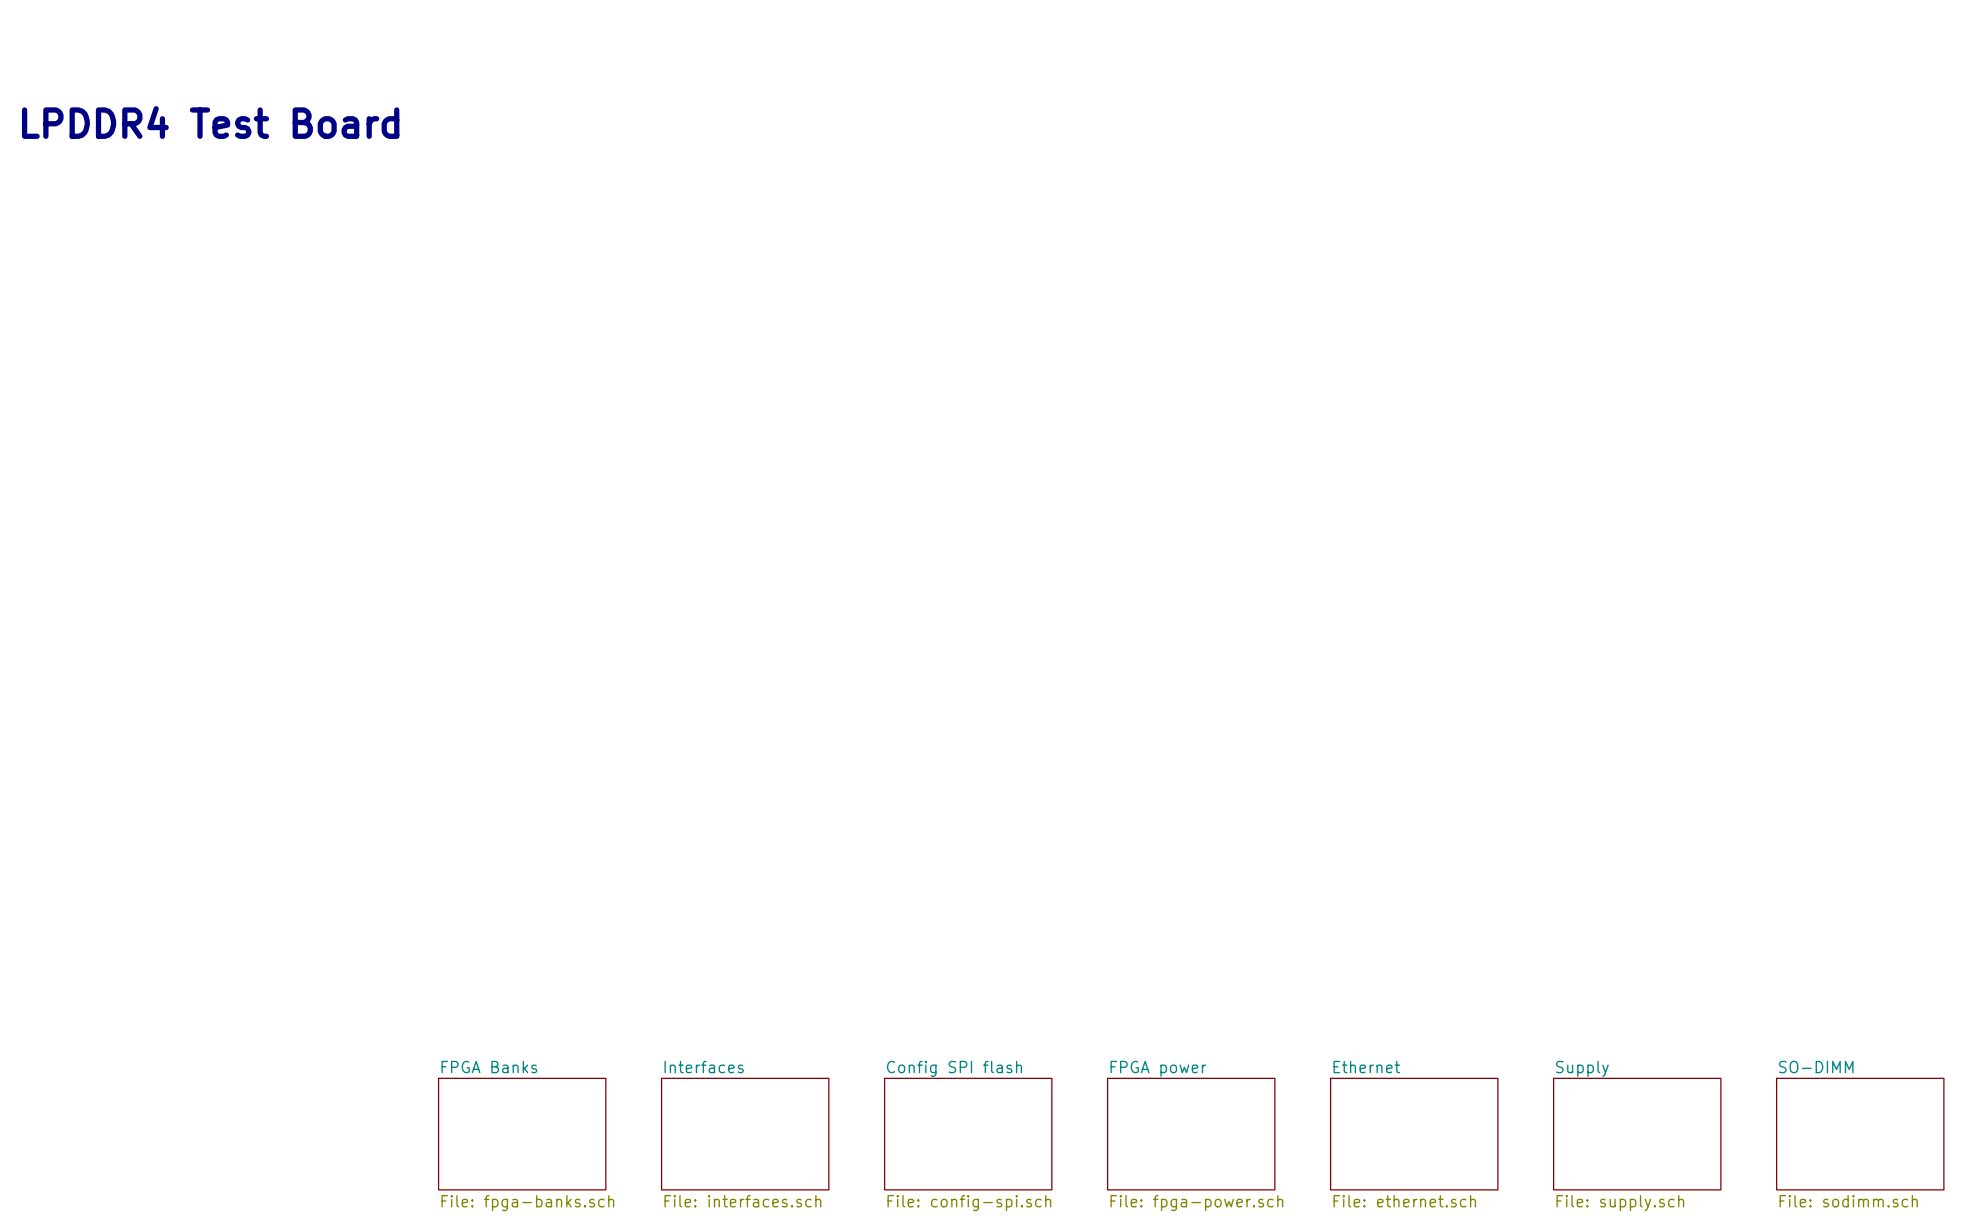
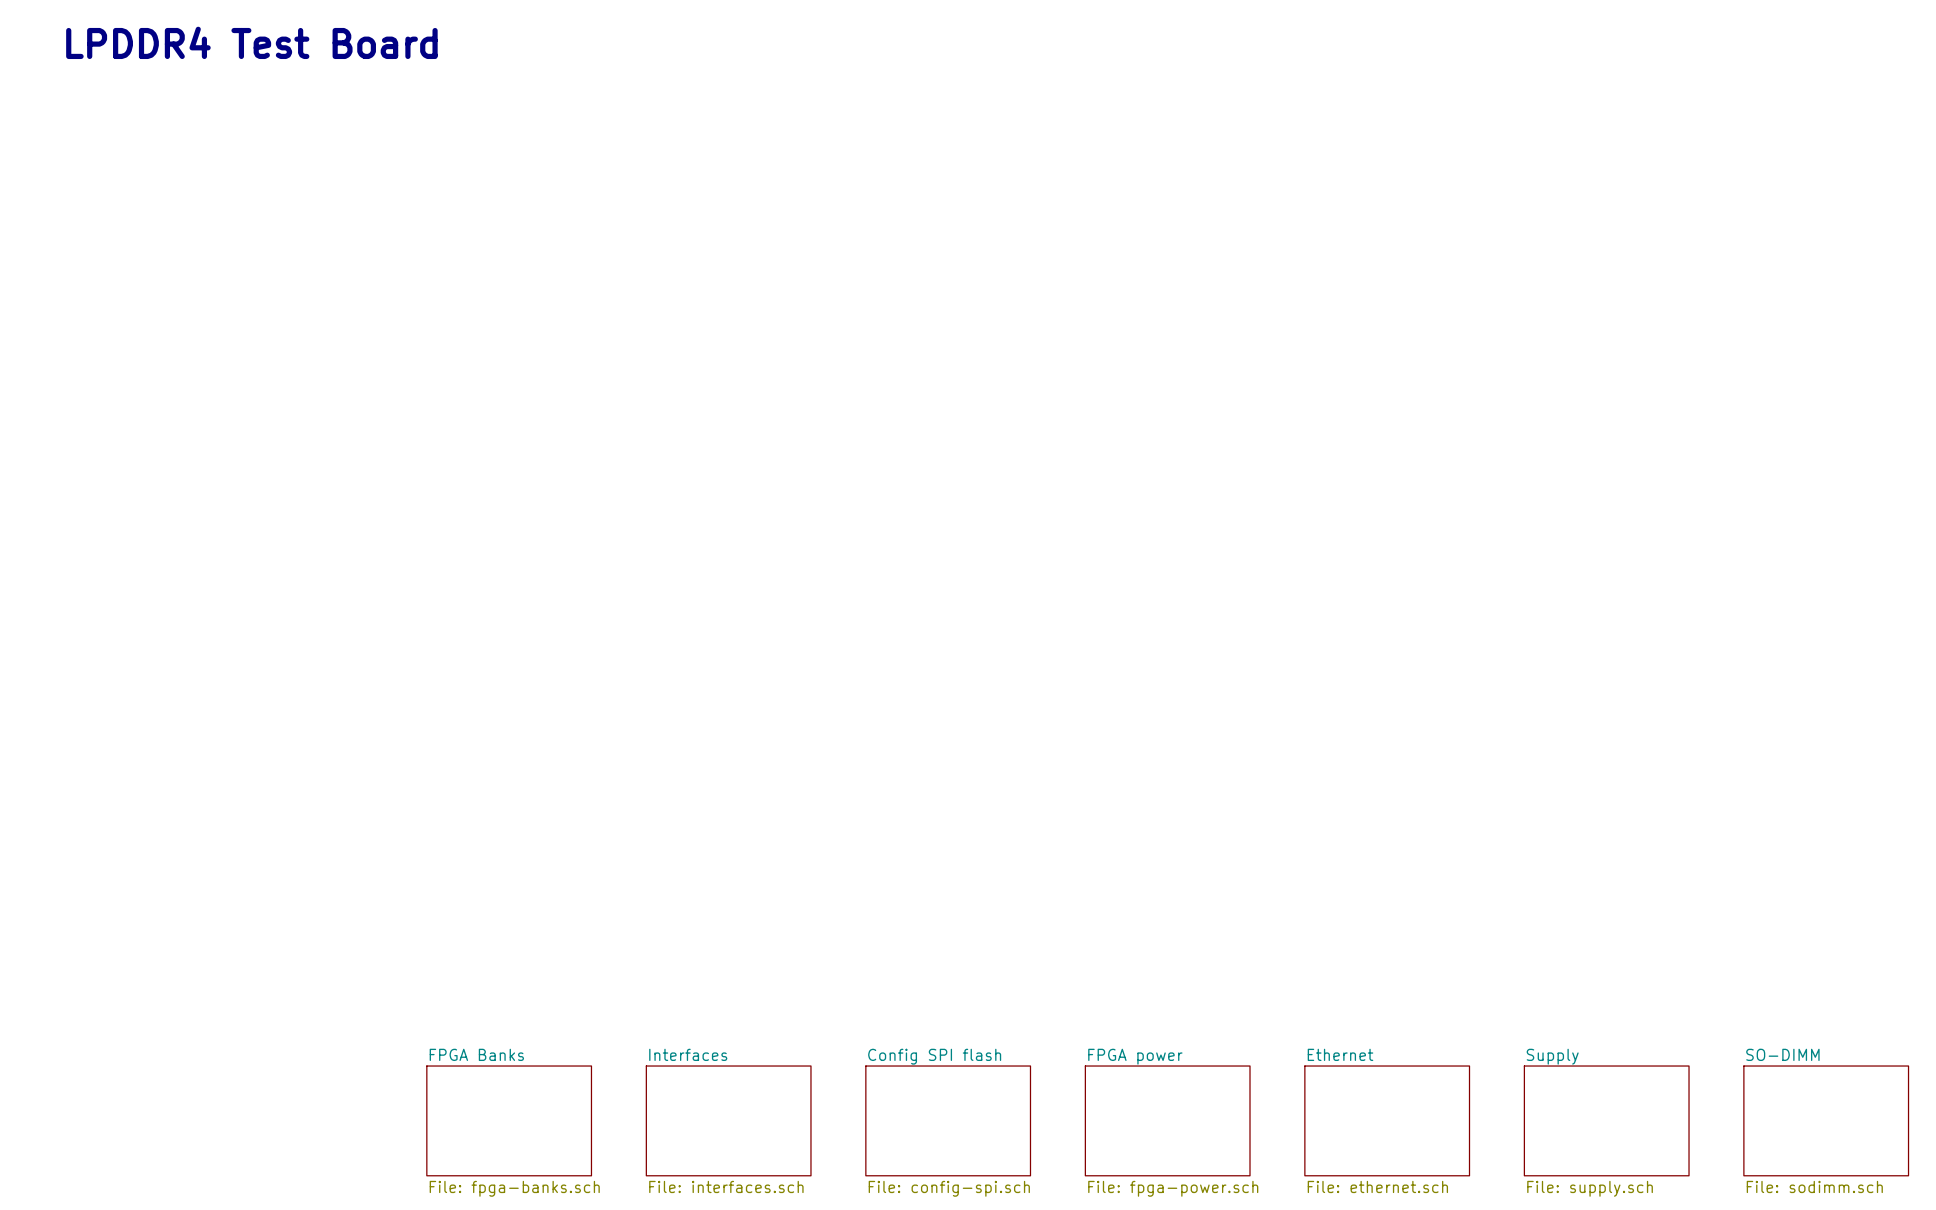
text position: LPDDR4 Test Board (210, 122) -> LPDDR4 Test Board (251, 42)

